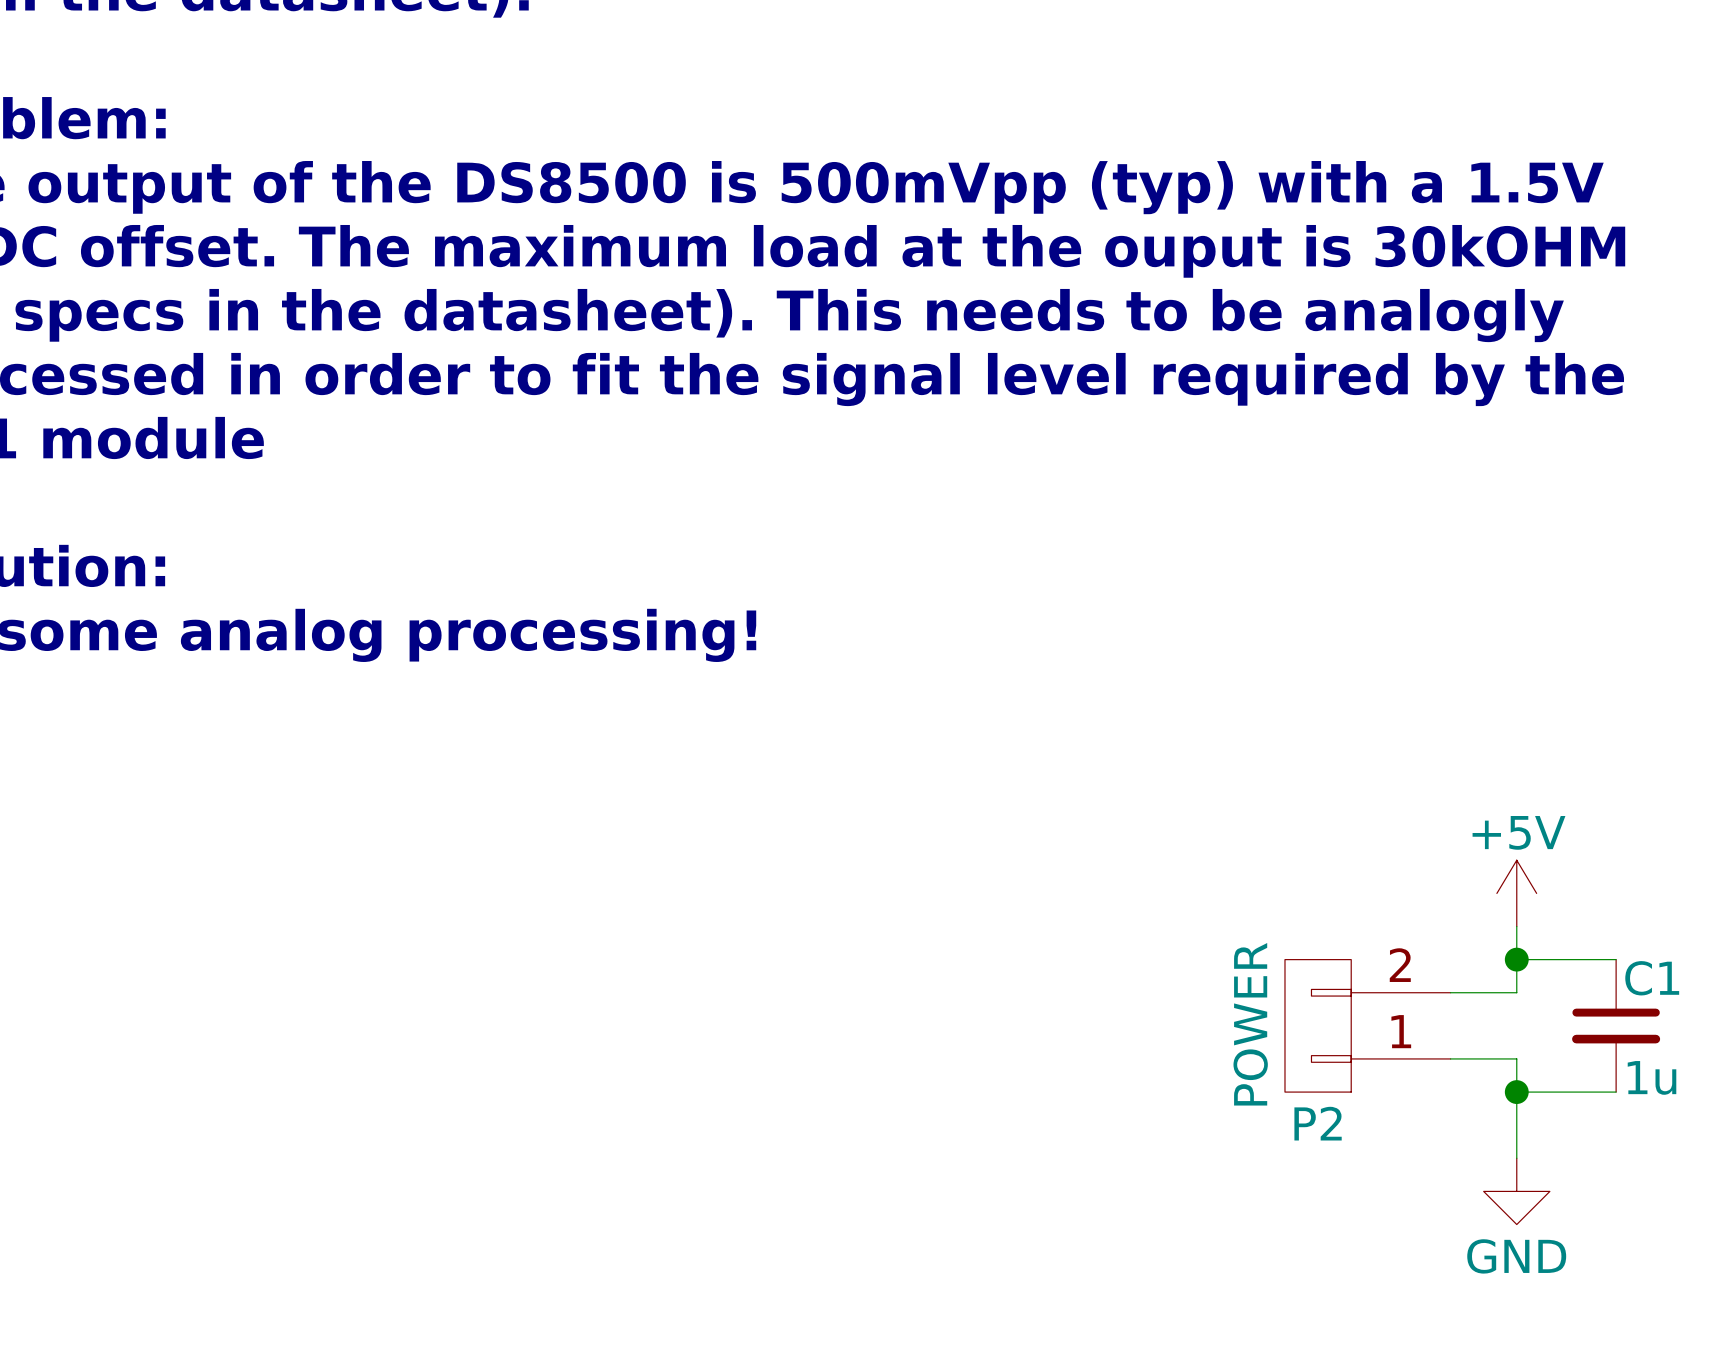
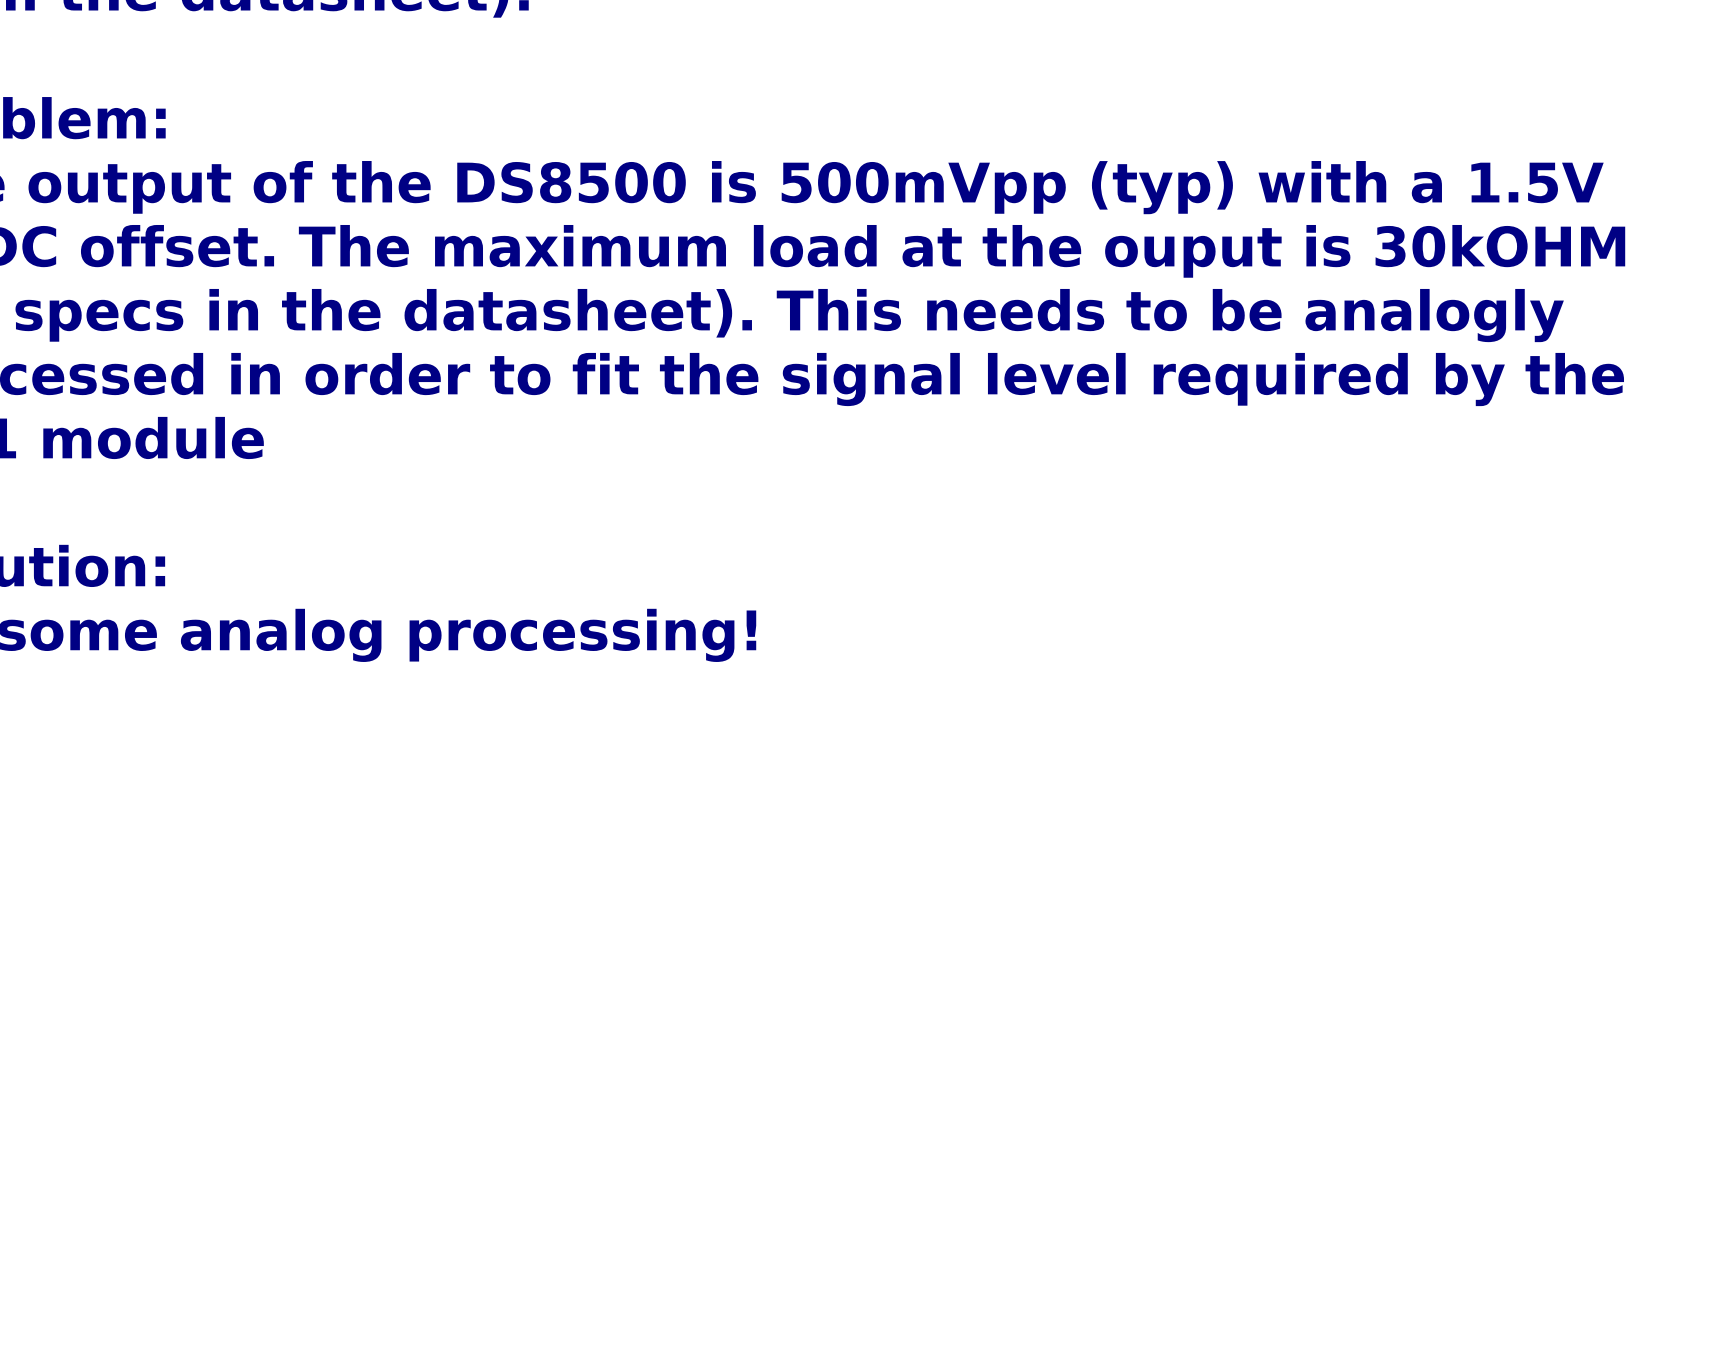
power symbol: +5V (1516, 893) -> none
wire: (1516, 926) (1516, 992) (1450, 992) -> none
wire: (1516, 959) (1616, 959) -> none
junction: (1516, 959) -> none
P2: POWER (1367, 1025) -> none
C1: 1u (1616, 1025) -> none
wire: (1450, 1058) (1516, 1058) (1516, 1158) -> none
wire: (1516, 1092) (1616, 1092) -> none
junction: (1516, 1092) -> none
power symbol: GND (1516, 1191) -> none

